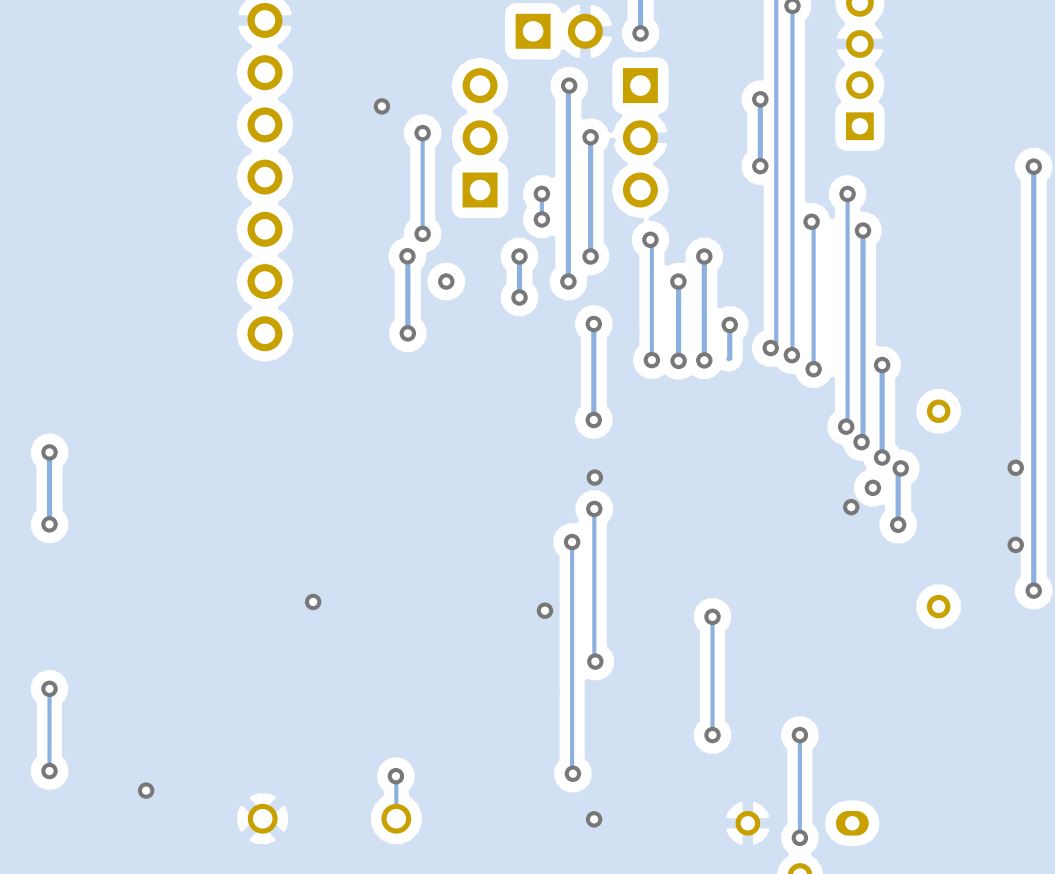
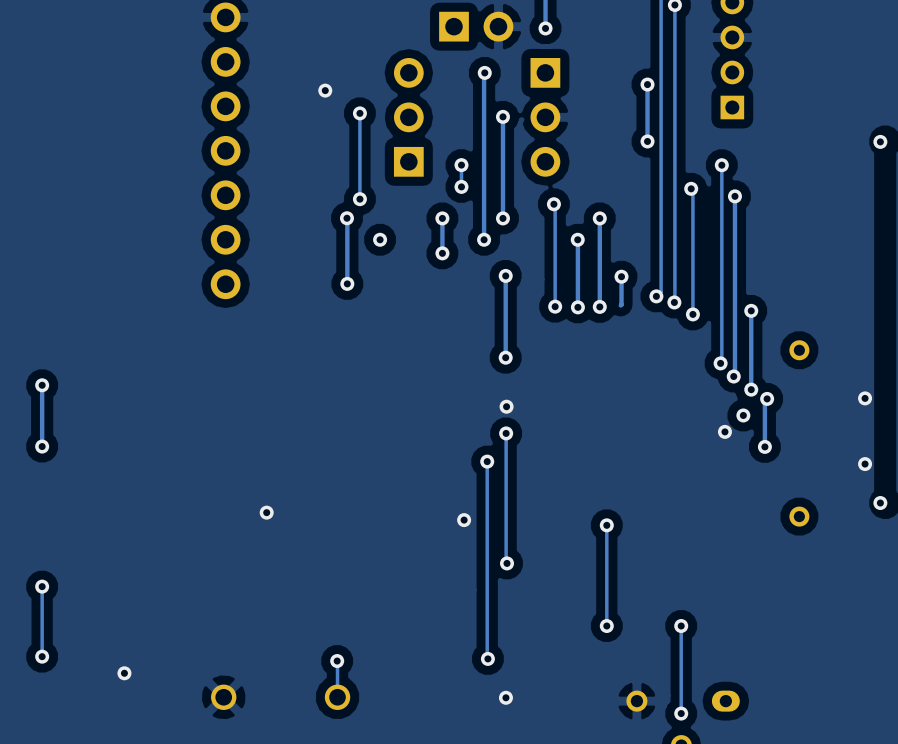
track: (1030, 166) (1033, 166) (1033, 590) -> none

